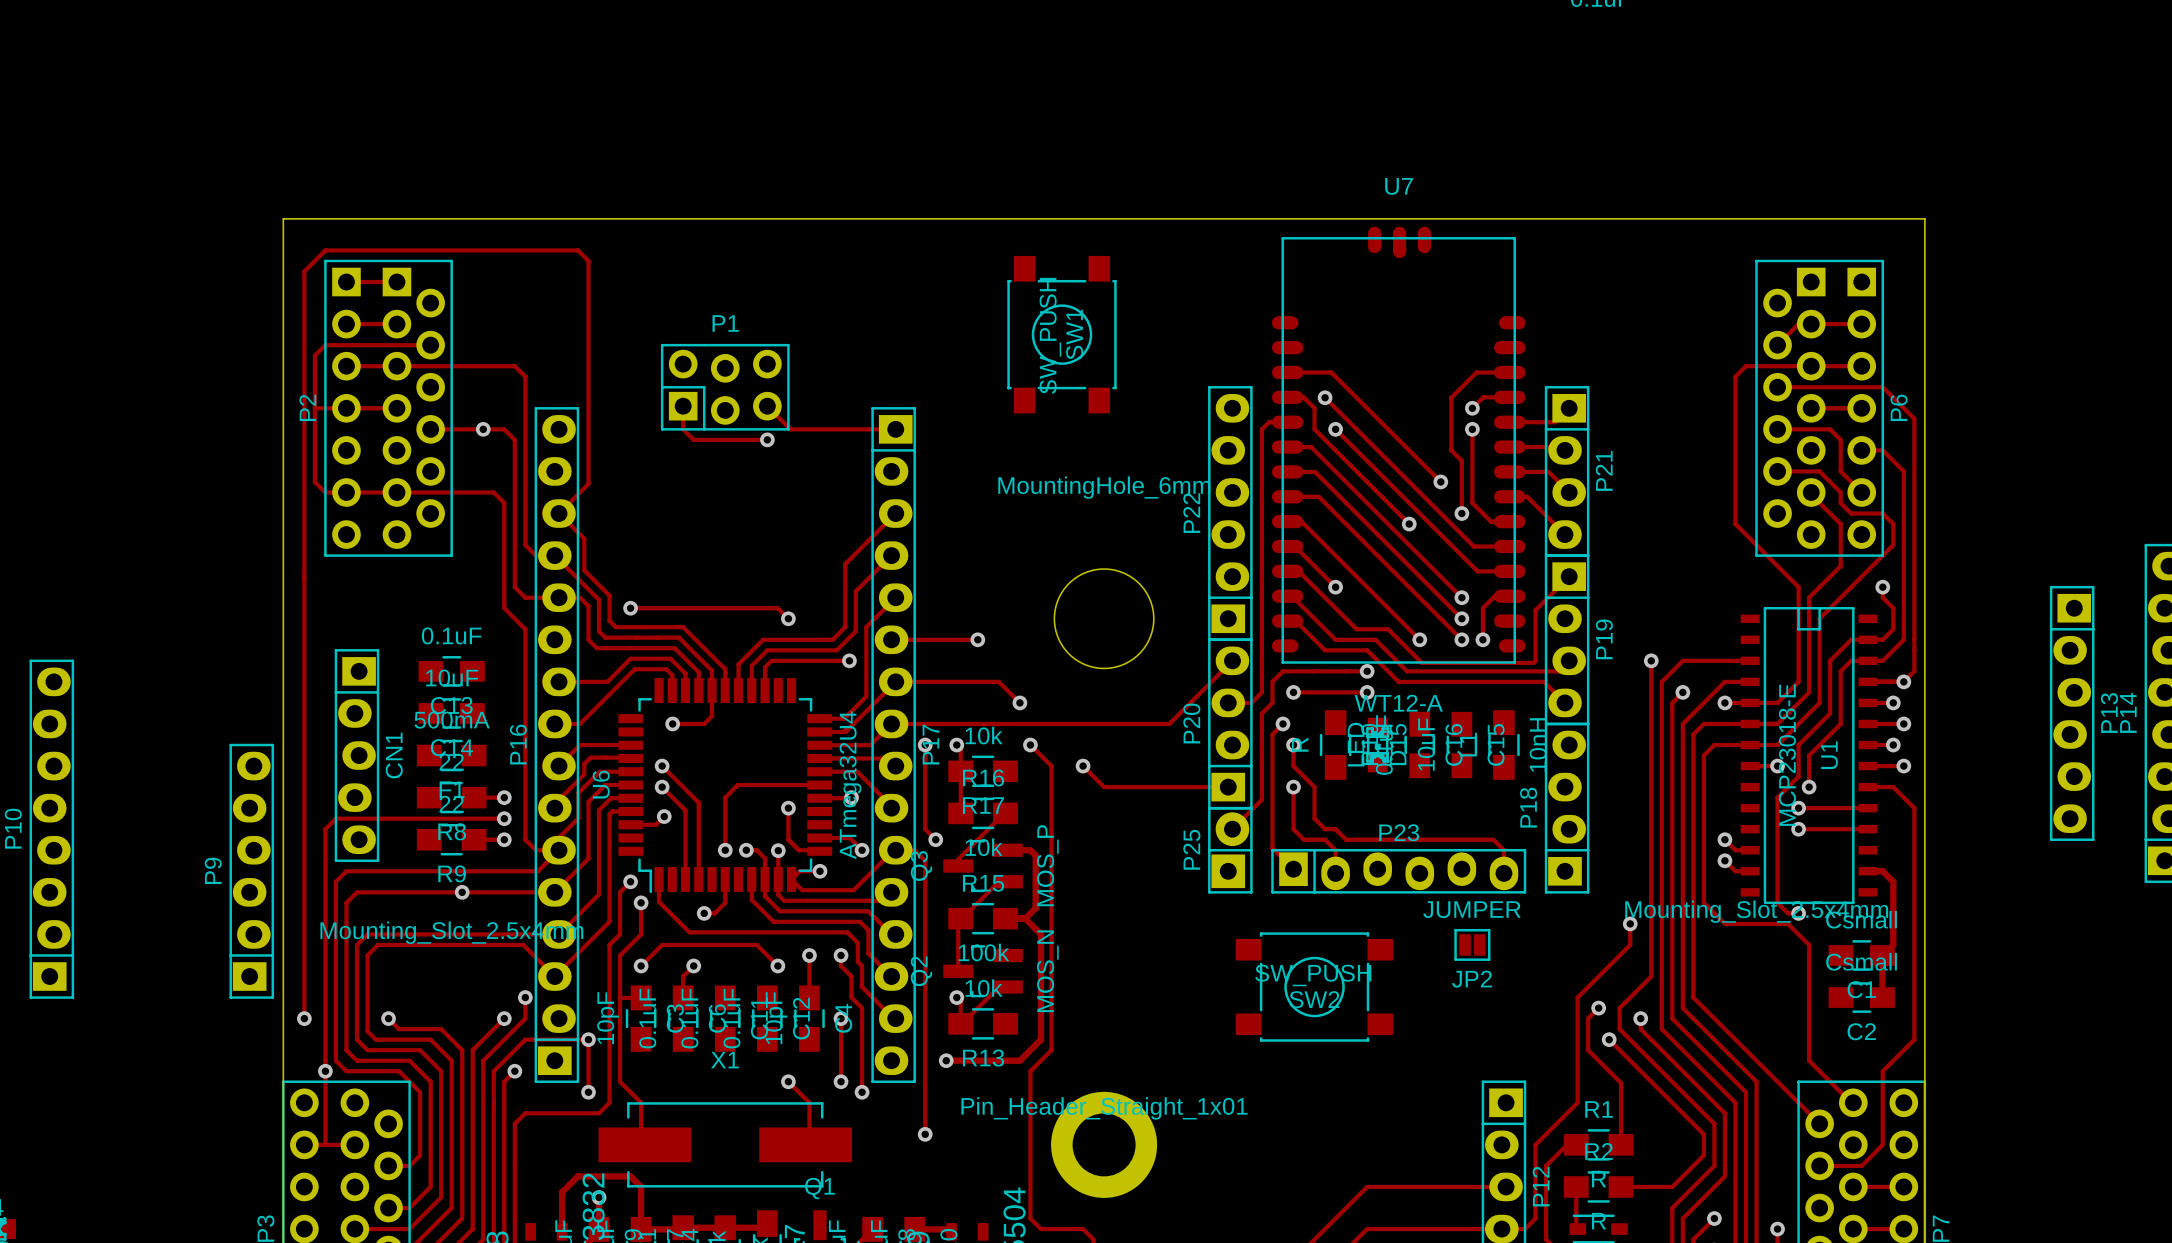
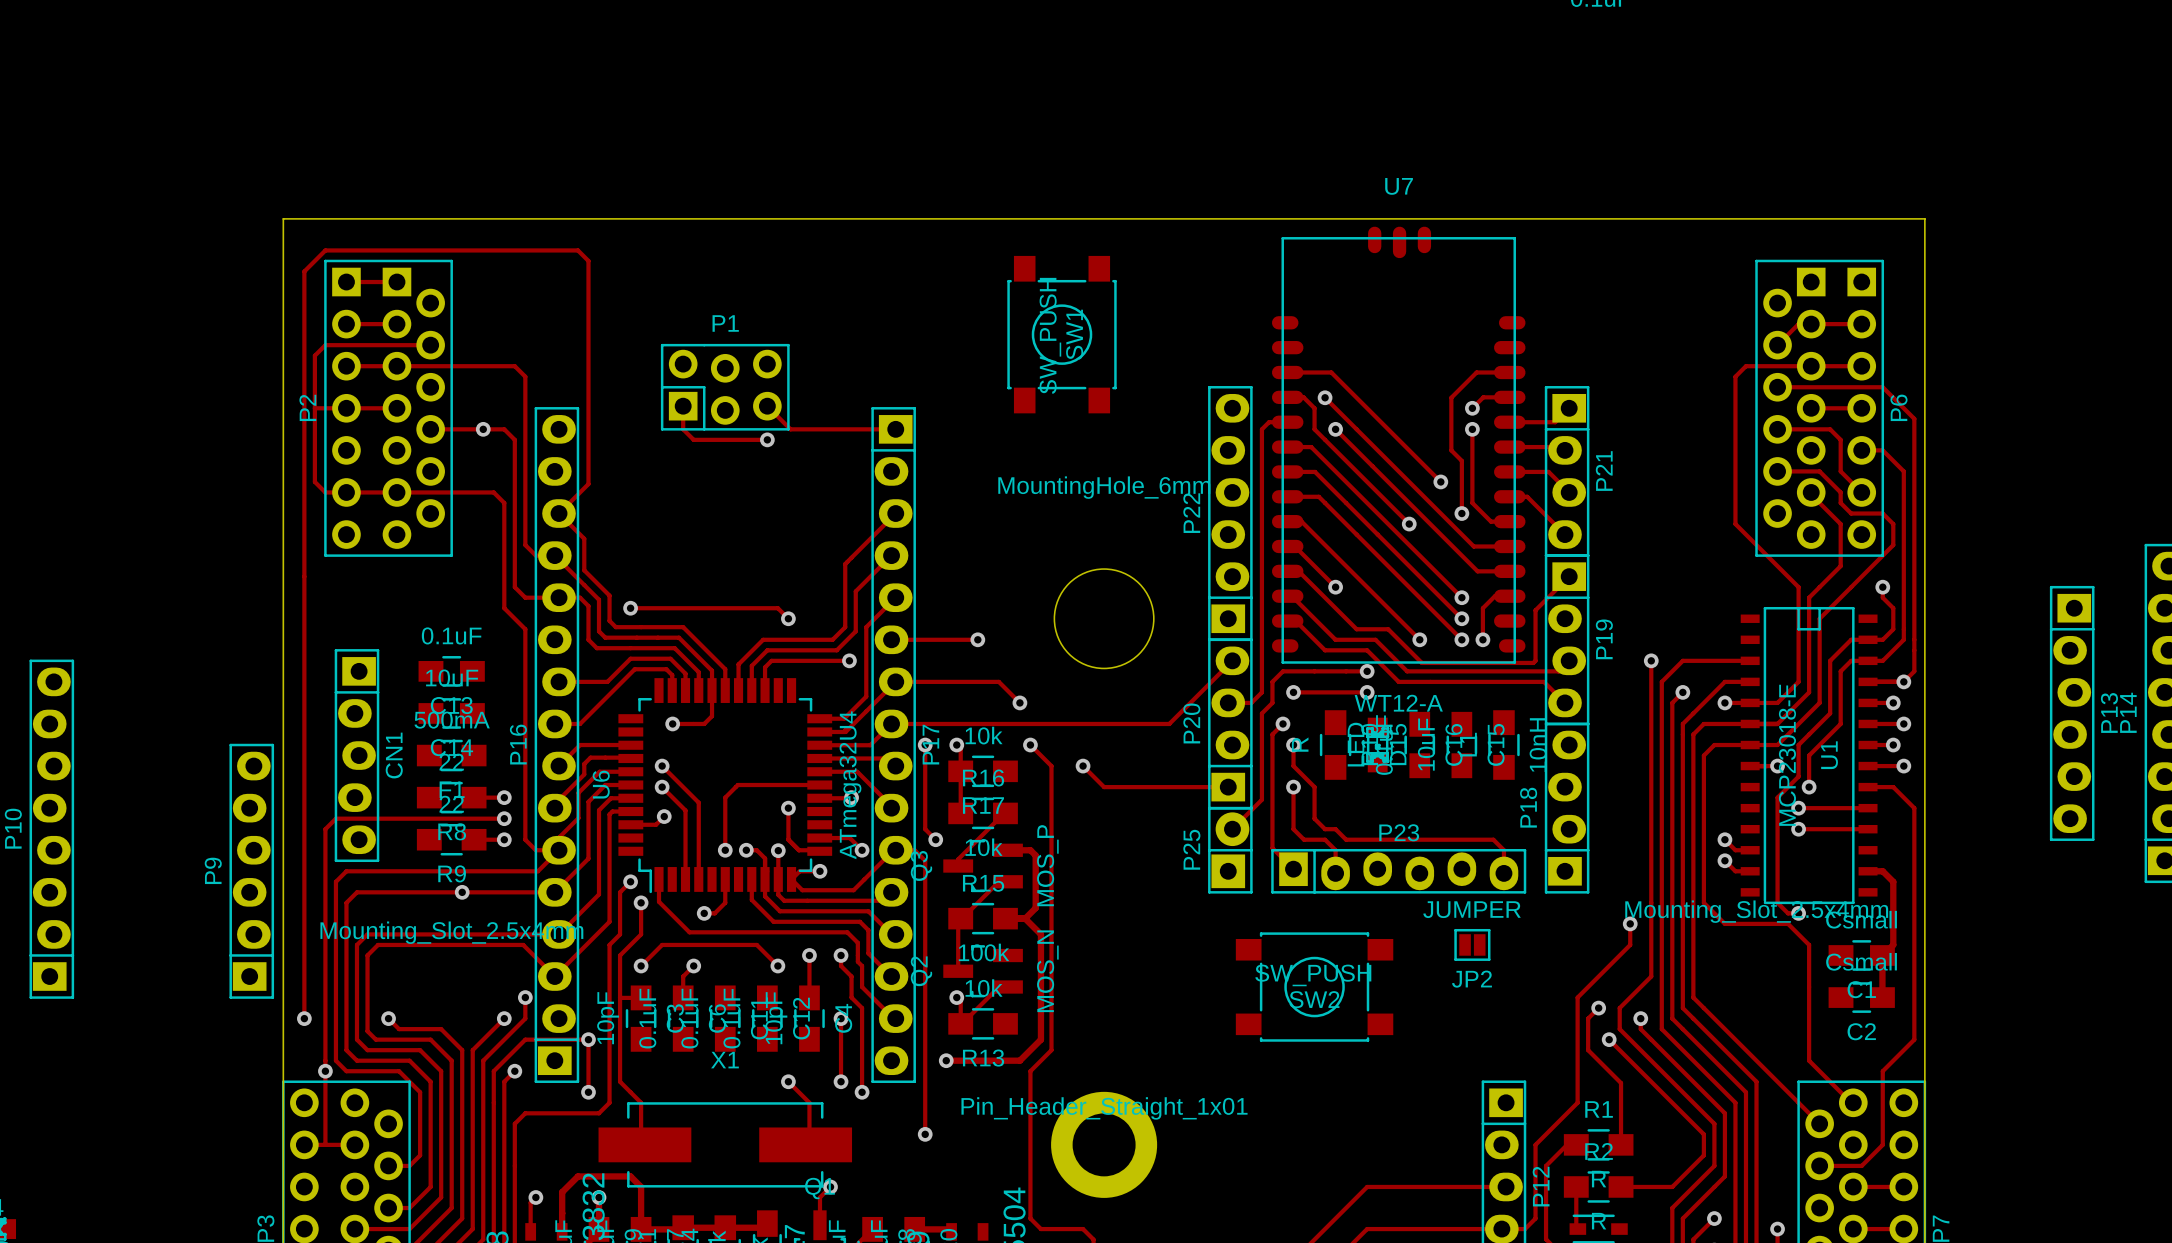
track: none -> (830, 1186) (819, 1197) (819, 1225)
via: none -> (830, 1186)
track: none -> (535, 1197) (530, 1202) (530, 1231)
via: none -> (535, 1197)

